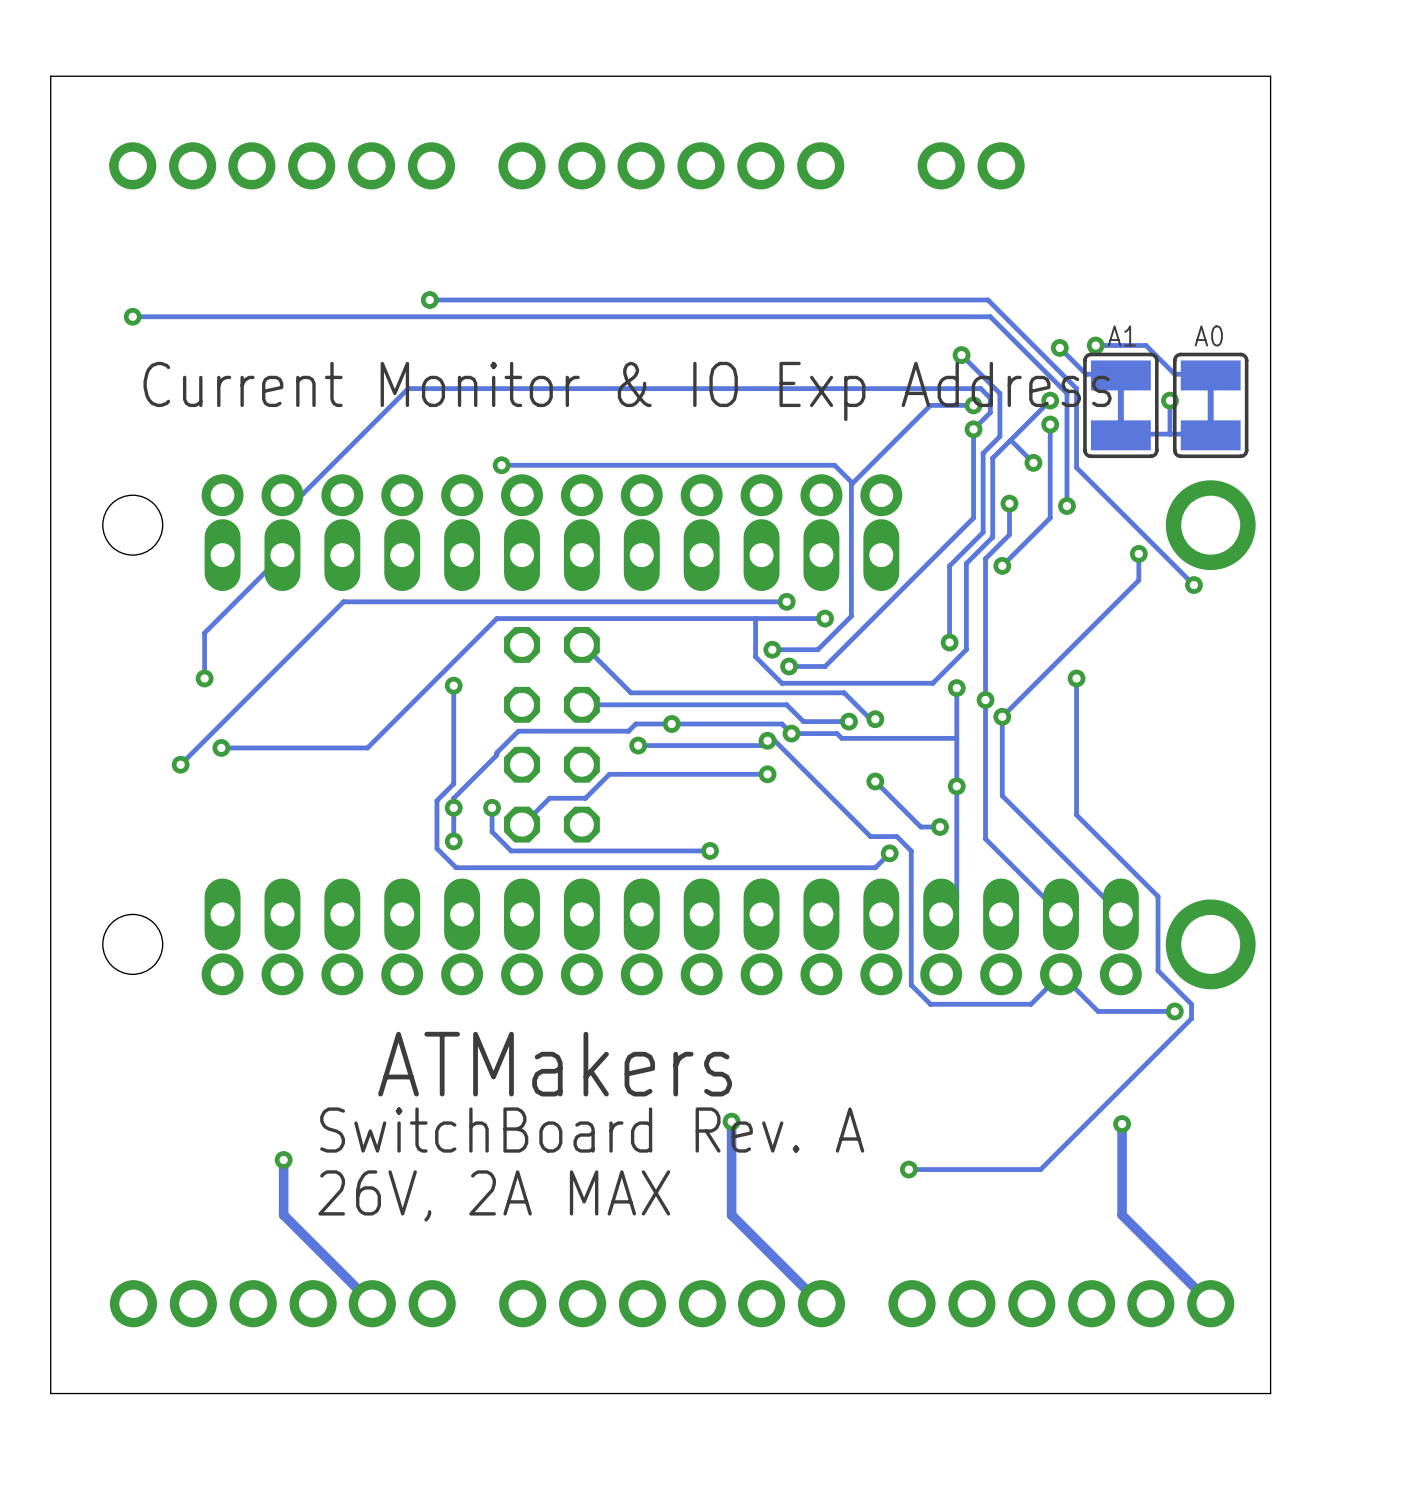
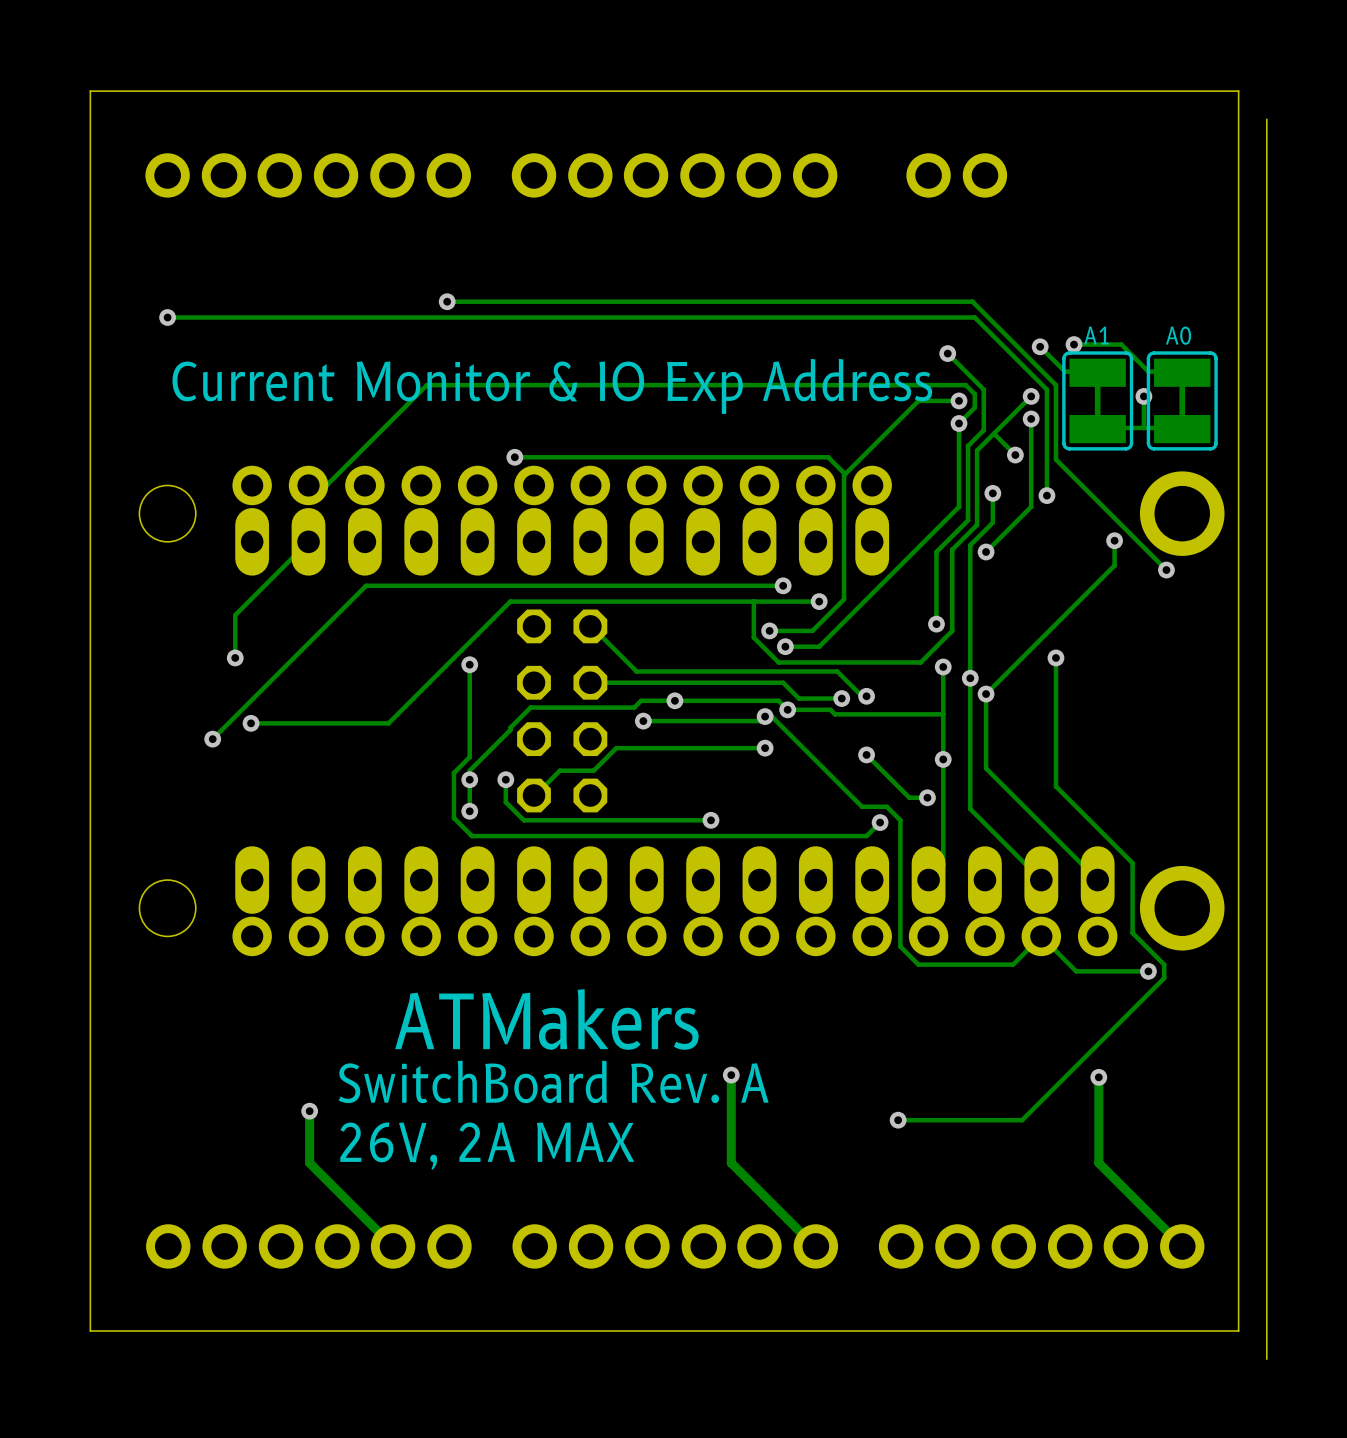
board edge: none -> (1266, 119) (1266, 1359)

